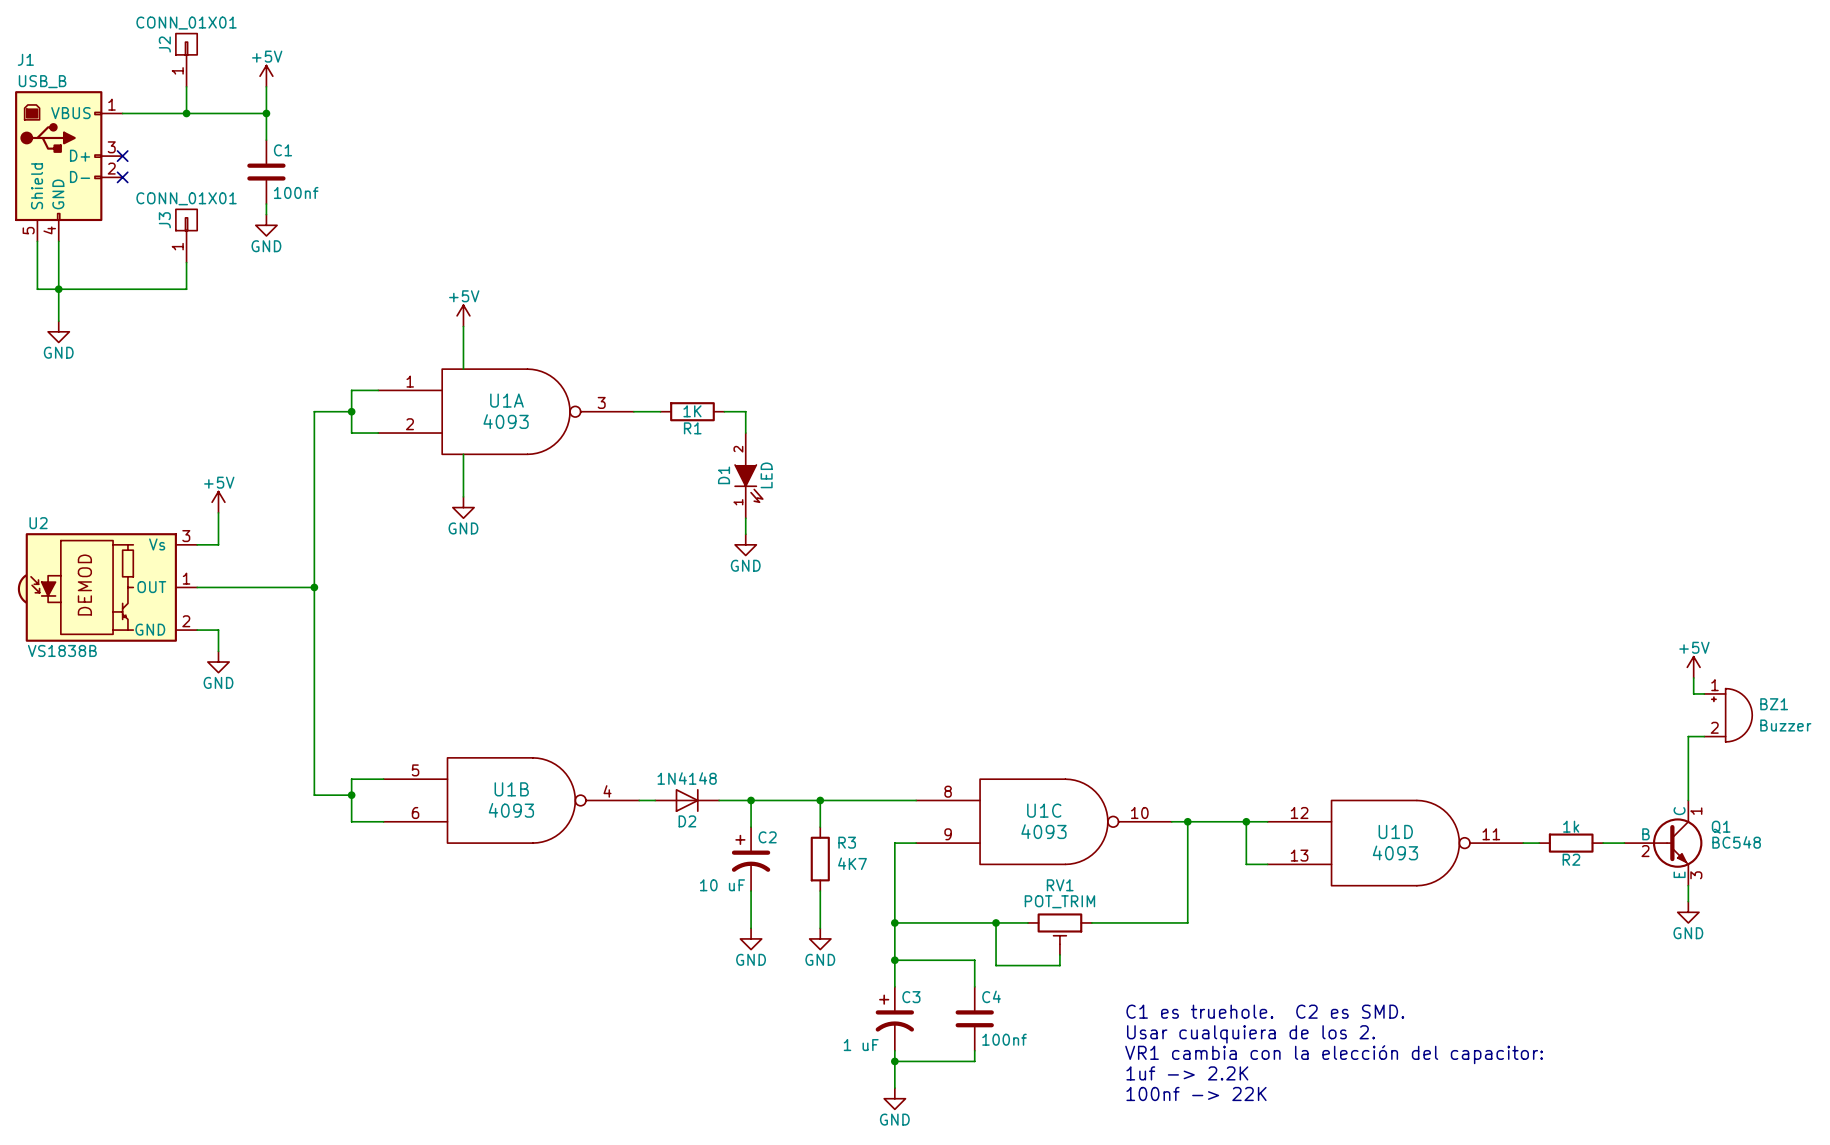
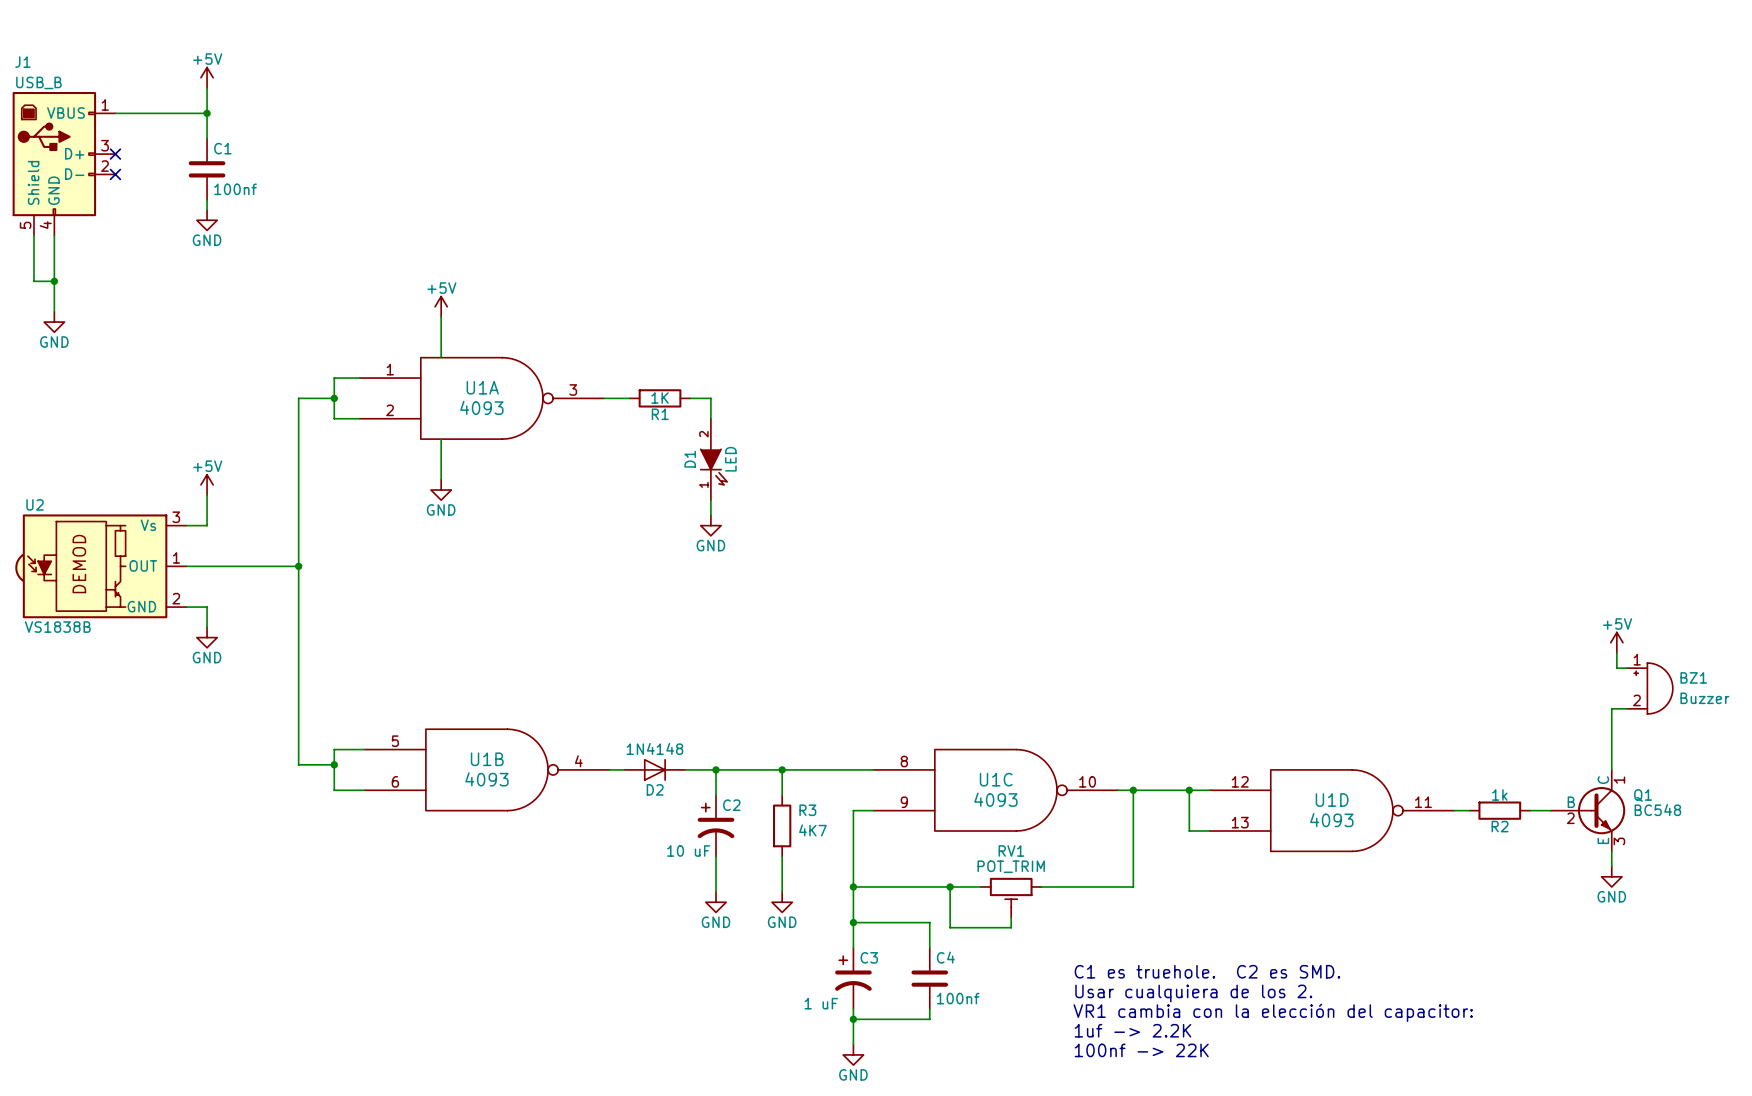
J2: CONN_01X01 (186, 60) -> none
power symbol position: +5V (266, 76) -> +5V (207, 77)
wire: (186, 86) (186, 113) -> none
wire: (266, 86) (266, 140) -> (207, 87) (207, 138)
junction: (186, 113) -> none
wire: (218, 113) (266, 113) -> none
junction: none -> (207, 113)
junction: (266, 113) -> none
C1 position: (266, 172) -> (207, 169)
wire: (266, 204) (266, 214) -> (207, 199) (207, 210)
power symbol position: GND (266, 225) -> GND (207, 220)
J3: CONN_01X01 (186, 235) -> none
wire: (186, 262) (186, 289) (58, 289) -> none

